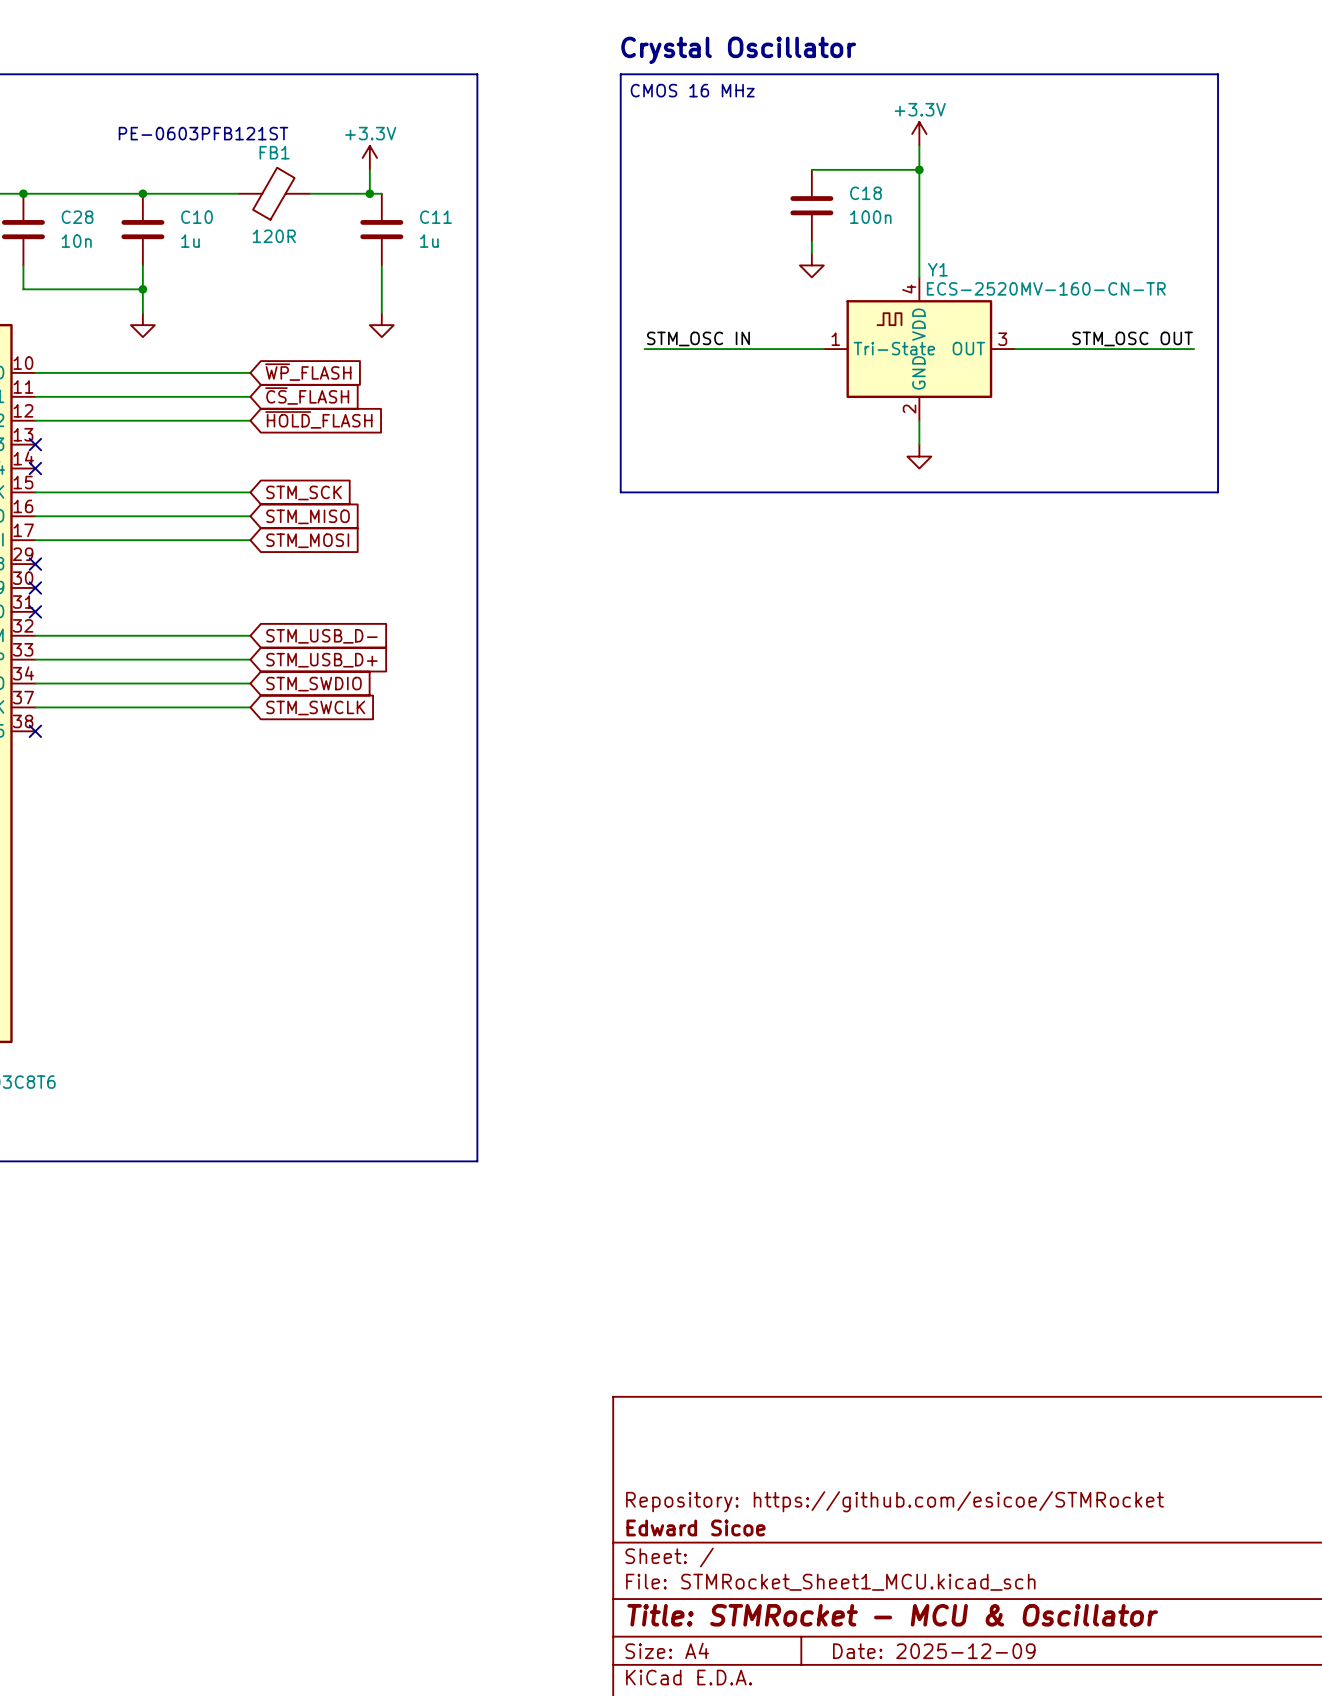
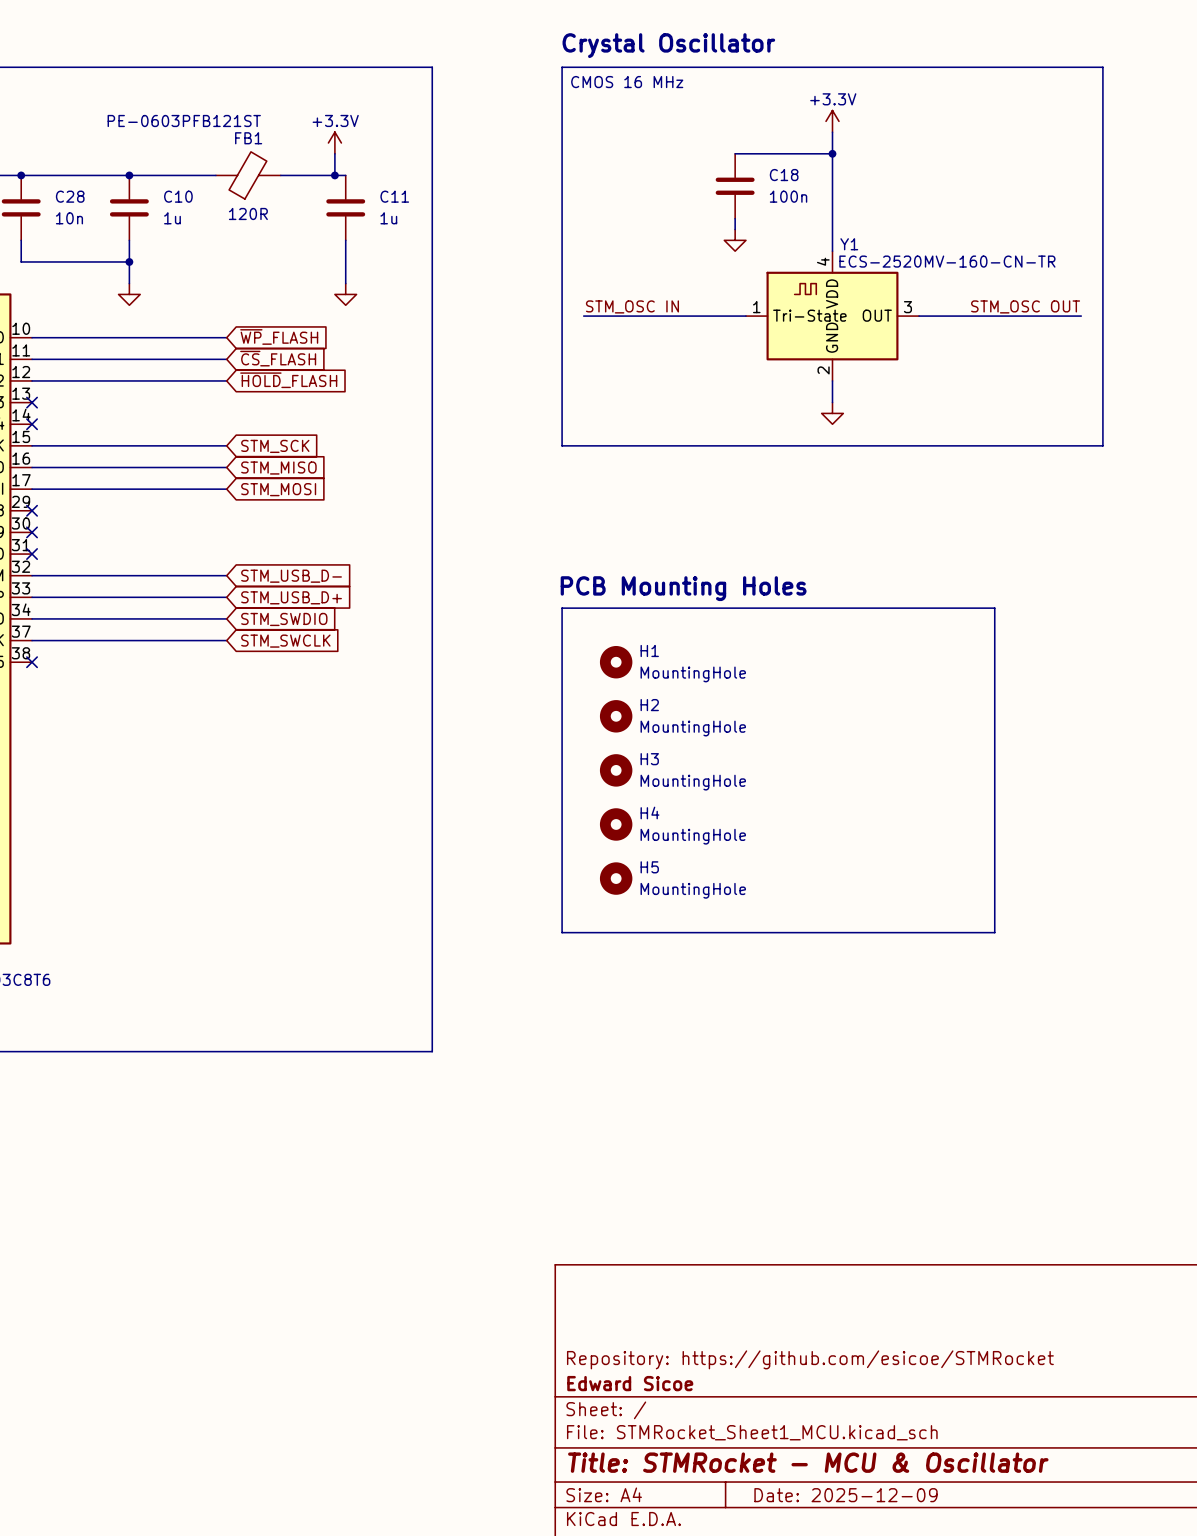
text: none -> PCB Mounting Holes (683, 588)
line: none -> (562, 608) (994, 608) (994, 932) (562, 932) (562, 608)
H1: none -> MountingHole (616, 662)
H2: none -> MountingHole (616, 716)
H3: none -> MountingHole (616, 770)
H4: none -> MountingHole (616, 824)
H5: none -> MountingHole (616, 878)

